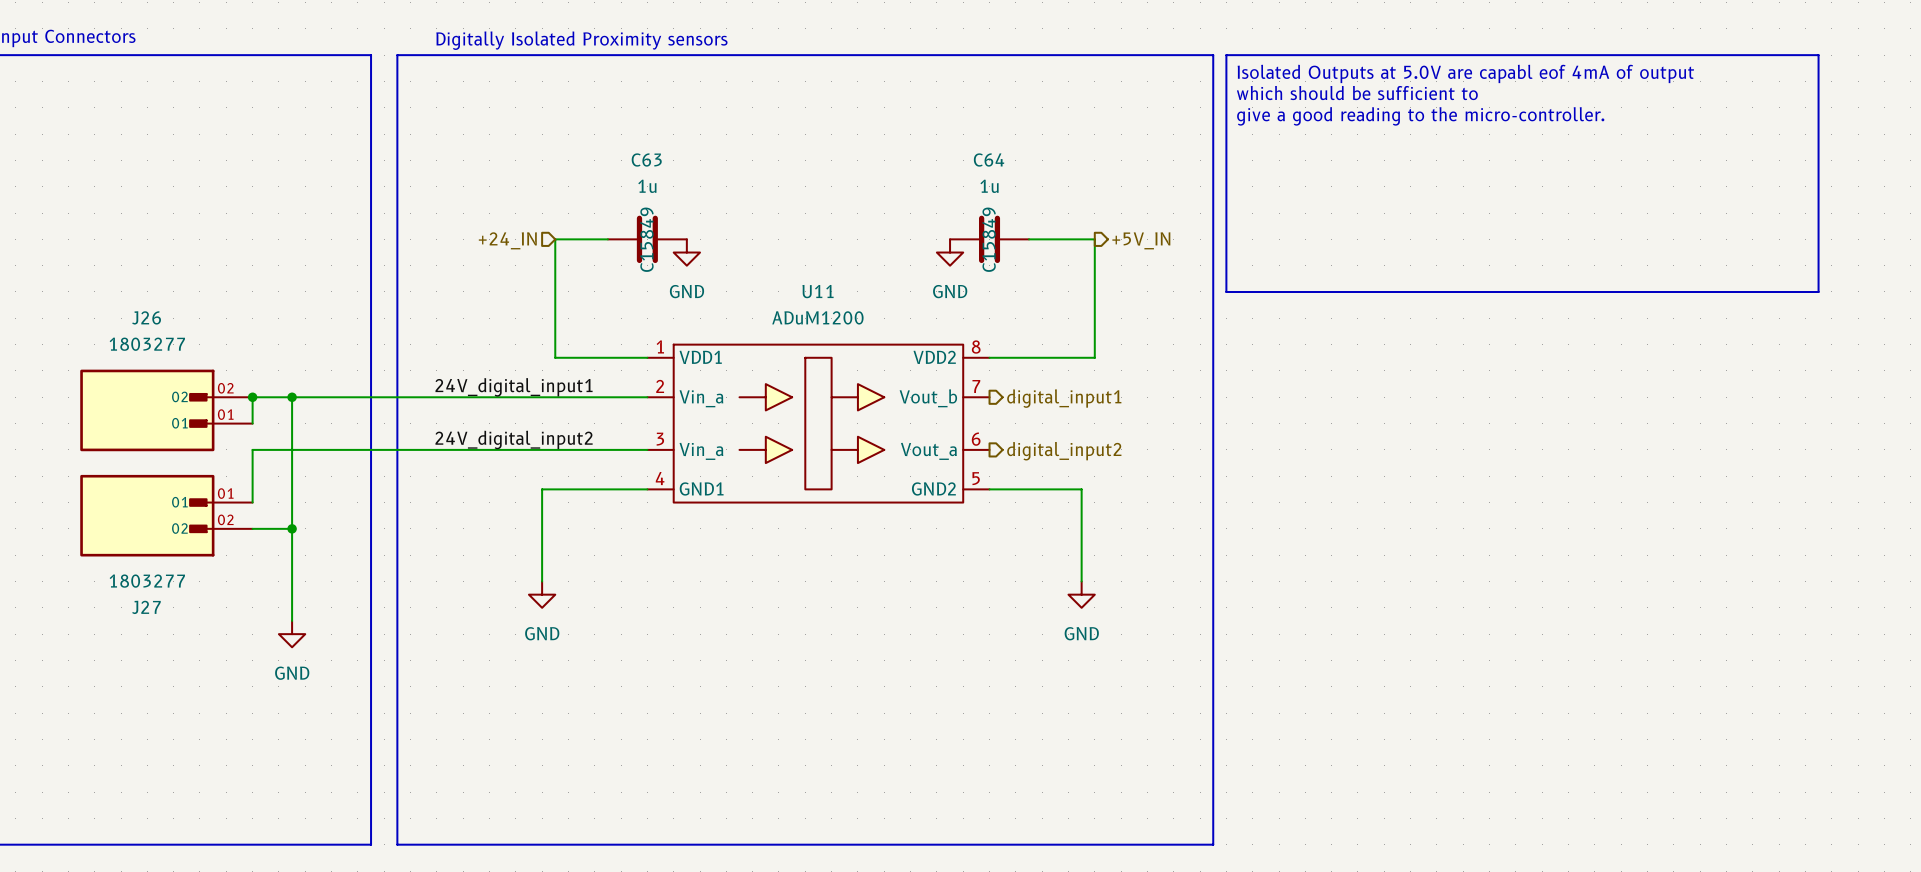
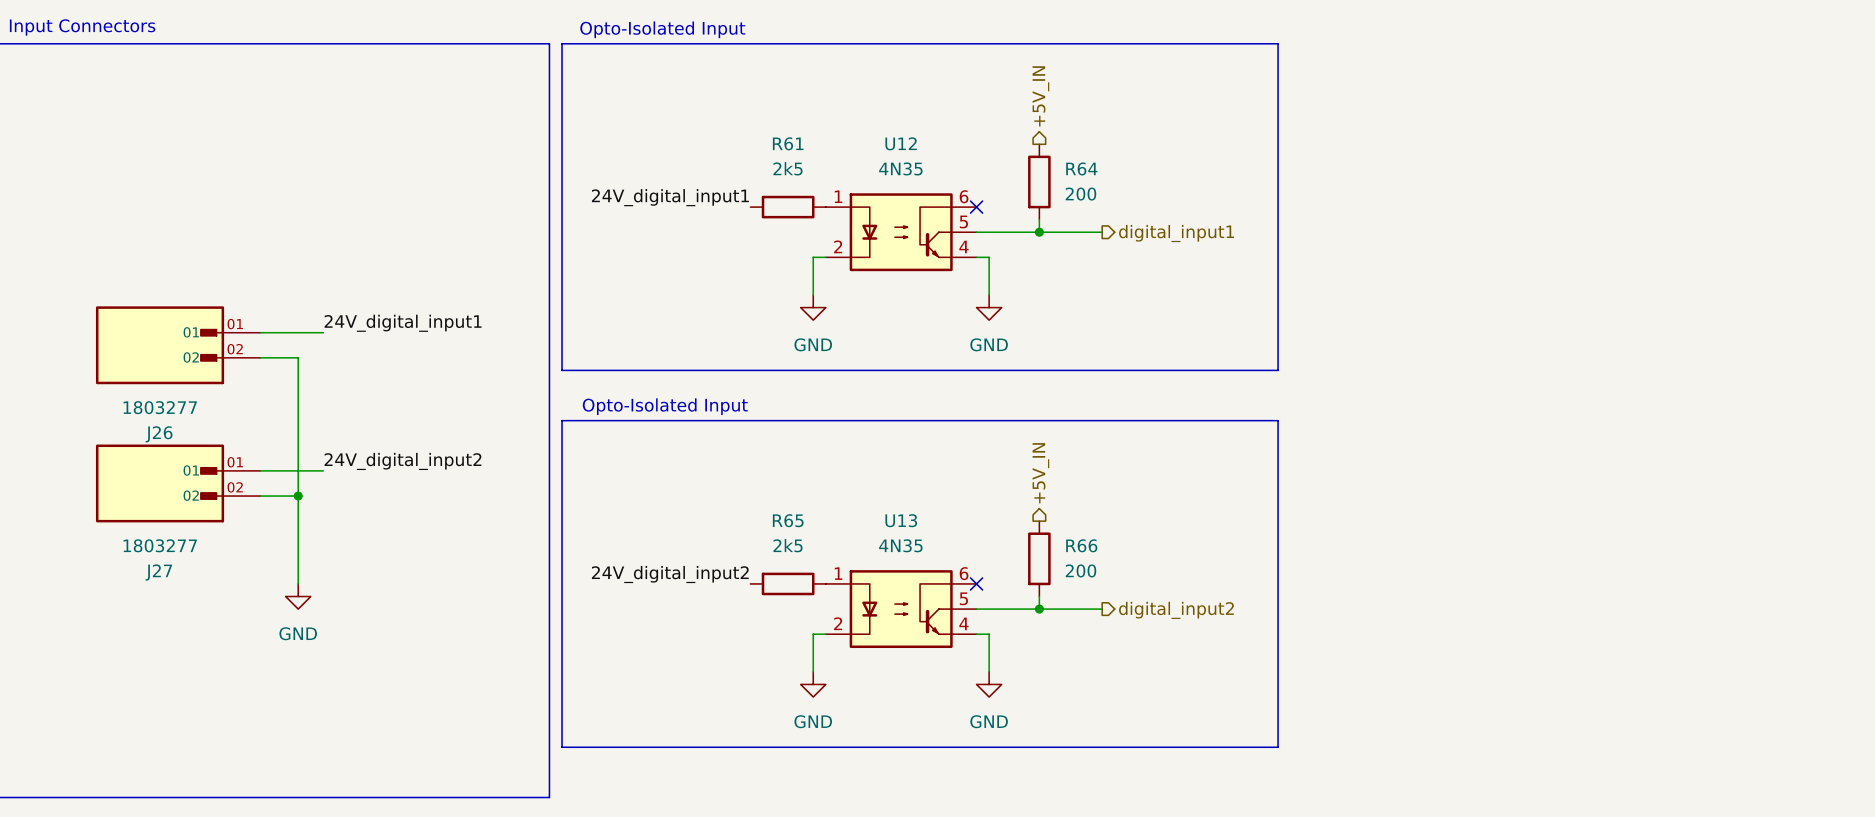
text: Digitally Isolated Proximity sensors (581, 40) -> none
text: none -> Opto-Isolated Input (662, 29)
line: (371, 55) (371, 844) -> (373, 43) (398, 43)
line: (397, 55) (397, 844) -> (373, 797) (398, 797)
line: (555, 55) (568, 55) -> (1278, 43) (1278, 370) (562, 370) (562, 43)
line: (1213, 55) (1213, 844) (555, 844) -> (549, 43) (549, 797)
line: (1226, 55) (1226, 291) (1818, 291) (1818, 55) (1318, 55) -> (1190, 43) (1177, 43)
text: Isolated Outputs at 5.0V are capabl eof 4mA of output (1465, 73) -> none
text: which should be sufficient to (1357, 93) -> none
text: give a good reading to the micro-controller. (1420, 116) -> none
R64: none -> 200 (1039, 181)
label: none -> 24V_digital_input1 (670, 197)
R61: none -> 2k5 (788, 207)
no-connect mark: none -> (976, 207)
wire: (607, 239) (555, 239) (555, 357) (647, 357) -> none
C63: 1u (647, 239) -> none
C64: 1u (989, 239) -> none
wire: (1029, 239) (1094, 239) (1094, 357) (989, 357) -> none
wire: none -> (1039, 219) (1039, 232)
hierarchical label: +24_IN (507, 240) -> none
hierarchical label rotation: 0° (1141, 240) -> 90° counterclockwise (1040, 96)
hierarchical label position: +5V_IN (1141, 240) -> +5V_IN (1040, 96)
power symbol: GND (686, 252) -> none
U12: none -> 4N35 (901, 232)
power symbol: GND (950, 252) -> none
wire: none -> (976, 232) (1102, 232)
junction: none -> (1039, 232)
wire: none -> (825, 257) (813, 257) (813, 295)
wire: none -> (976, 257) (989, 257) (989, 295)
power symbol: none -> GND (813, 307)
power symbol: none -> GND (989, 307)
label: none -> 24V_digital_input1 (403, 323)
wire: none -> (260, 332) (323, 332)
wire: none -> (260, 357) (298, 357) (298, 370)
label: 24V_digital_input1 (514, 387) -> none
junction: (252, 397) -> none
junction: (292, 397) -> none
wire: (647, 397) (252, 397) (252, 423) -> none
hierarchical label position: digital_input1 (1064, 398) -> digital_input1 (1176, 233)
J26 flip: as is (147, 410) -> up-down (160, 345)
U11: ADuM1200 (818, 423) -> none
text: none -> Opto-Isolated Input (665, 406)
label: 24V_digital_input2 (514, 439) -> none
line: none -> (562, 420) (1278, 420) (1278, 747) (562, 747) (562, 420)
wire: (647, 449) (252, 449) (252, 502) -> (323, 470) (260, 470)
hierarchical label position: digital_input2 (1064, 451) -> digital_input2 (1176, 610)
wire: (647, 489) (542, 489) (542, 581) -> none
wire: (989, 489) (1081, 489) (1081, 581) -> none
label: none -> 24V_digital_input2 (402, 461)
hierarchical label: none -> +5V_IN (1040, 473)
power symbol: GND (542, 594) -> none
R66: none -> 200 (1039, 558)
power symbol: GND (1081, 594) -> none
label: none -> 24V_digital_input2 (670, 574)
R65: none -> 2k5 (788, 583)
no-connect mark: none -> (976, 583)
wire: none -> (1039, 596) (1039, 609)
U13: none -> 4N35 (901, 609)
wire: none -> (976, 609) (1102, 609)
junction: none -> (1039, 609)
wire: none -> (825, 634) (813, 634) (813, 671)
wire: none -> (976, 634) (989, 634) (989, 671)
power symbol: none -> GND (813, 684)
power symbol: none -> GND (989, 684)

